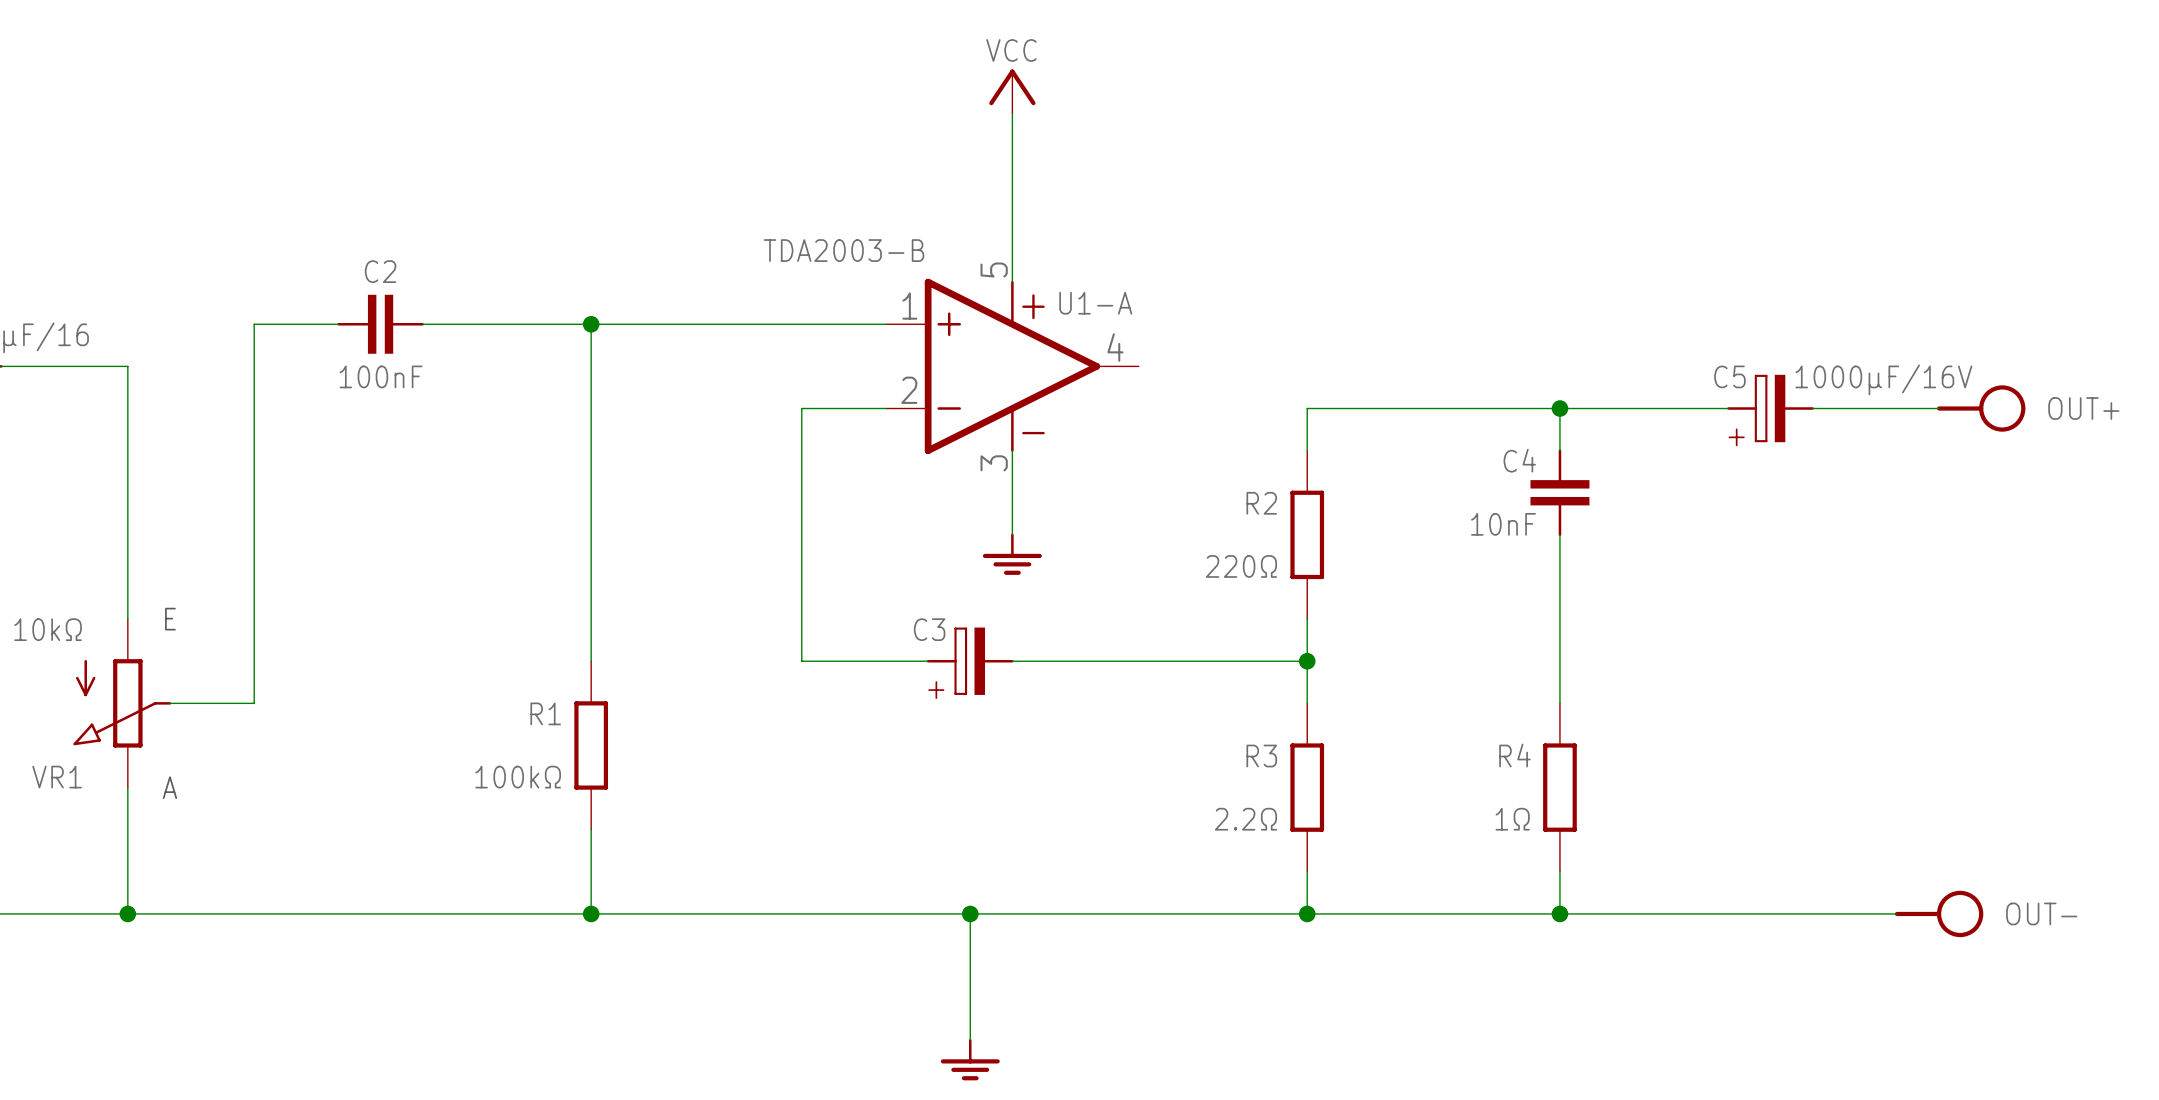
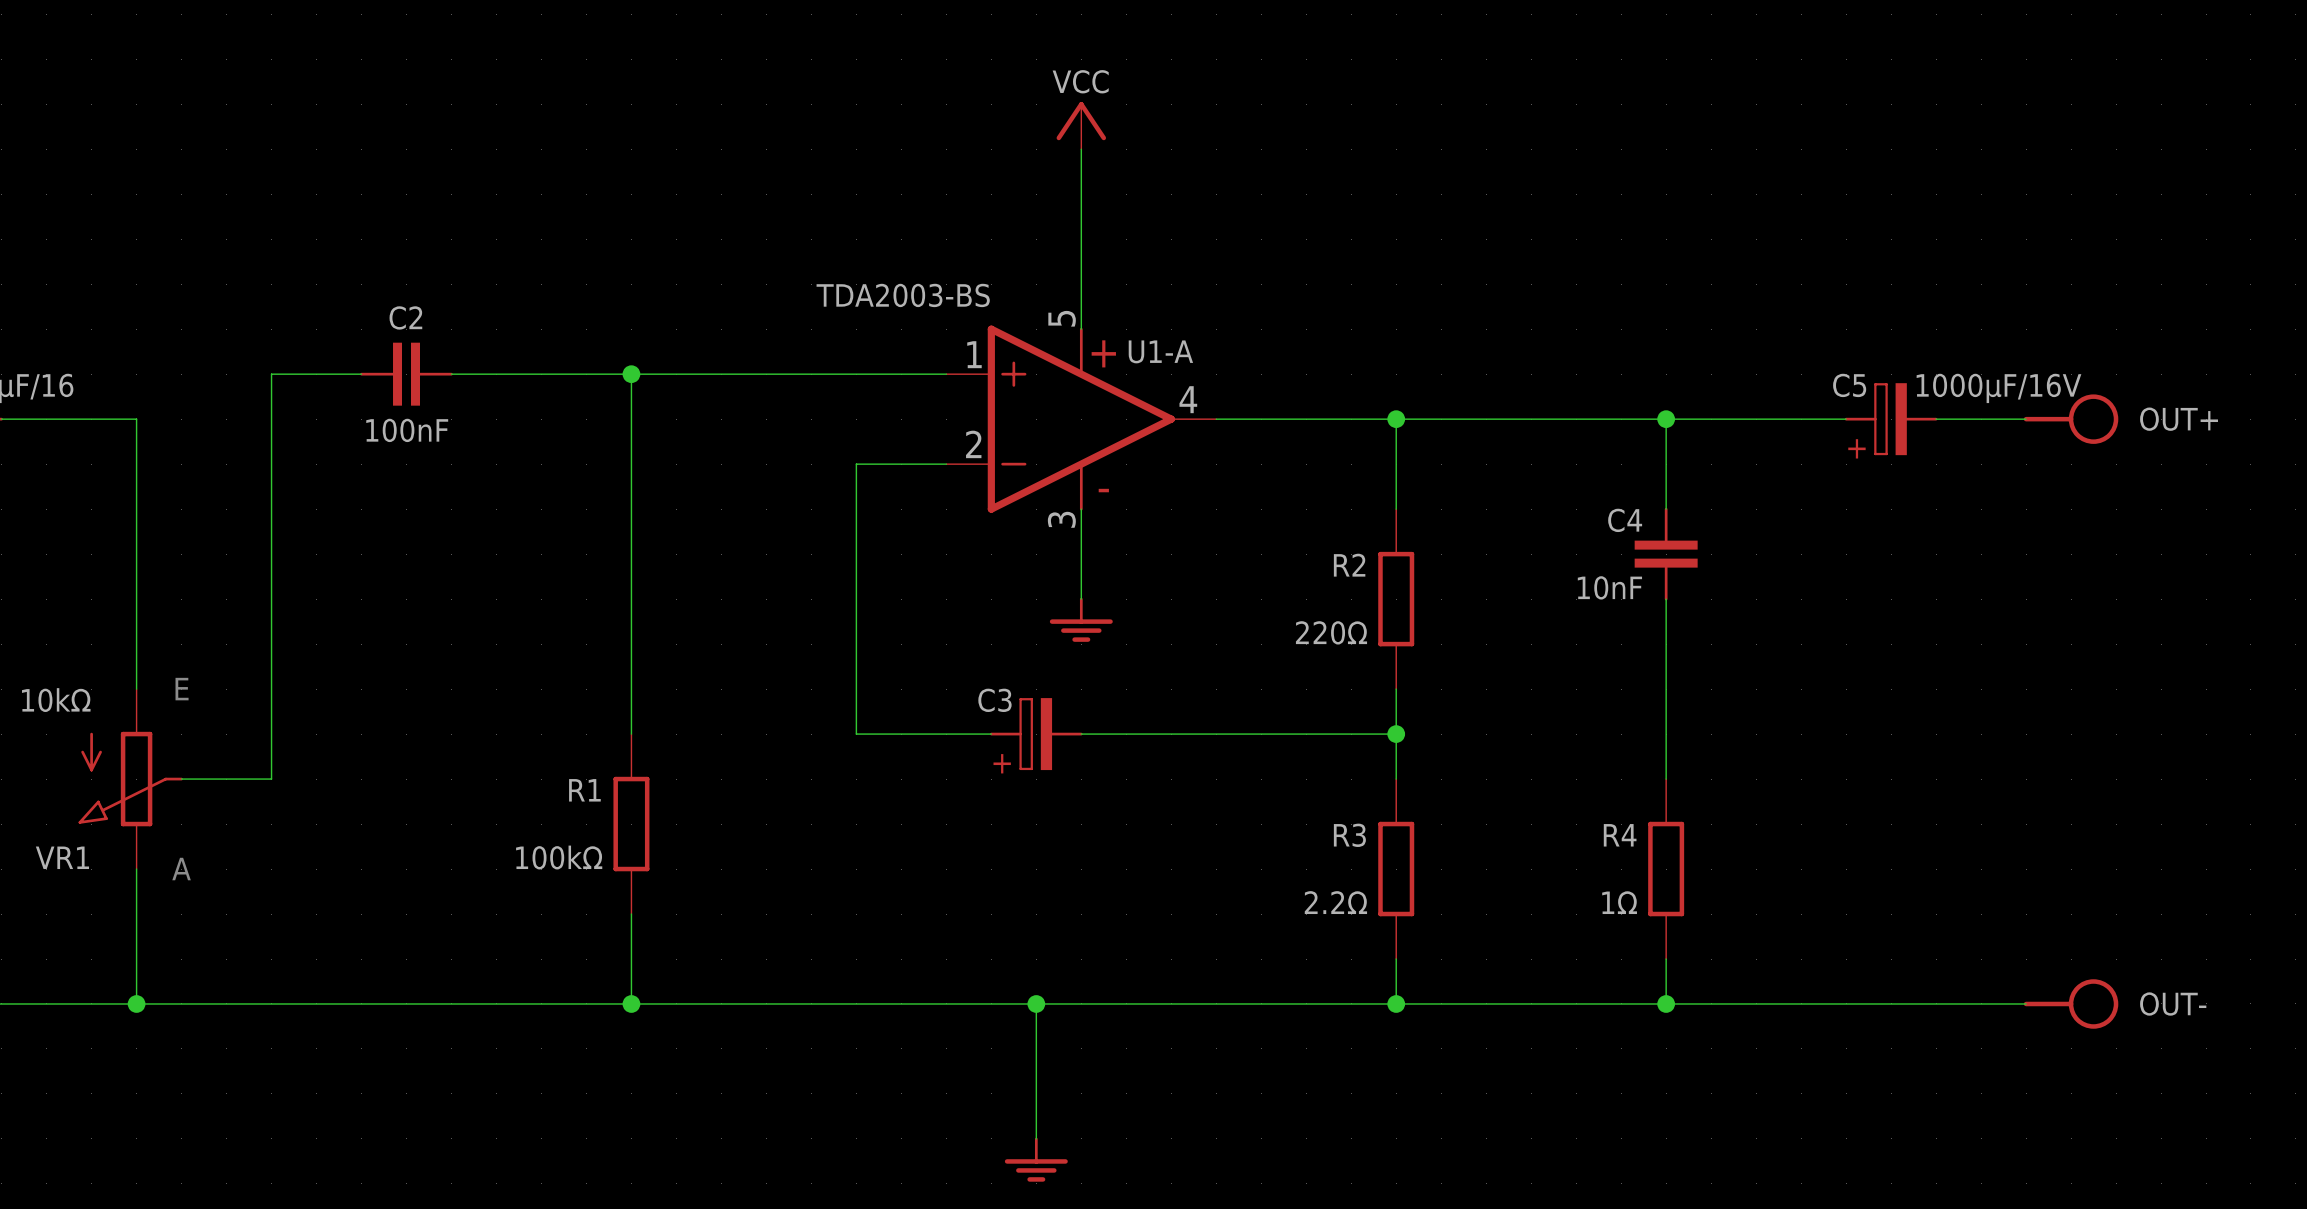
U1-A value: TDA2003-B (843, 250) -> TDA2003-BS (903, 295)
wire: none -> (1216, 419) (1846, 419)
junction: none -> (1396, 419)
wire: none -> (1666, 419) (1666, 464)
wire: none -> (1936, 419) (2026, 419)
wire: (1307, 408) (1728, 408) -> (1396, 464) (1396, 419)
junction position: (1559, 408) -> (1666, 419)
C5 position: (1770, 408) -> (1891, 419)
wire: (1812, 408) (1939, 408) -> none
OUT+ position: (1981, 408) -> (2071, 419)

